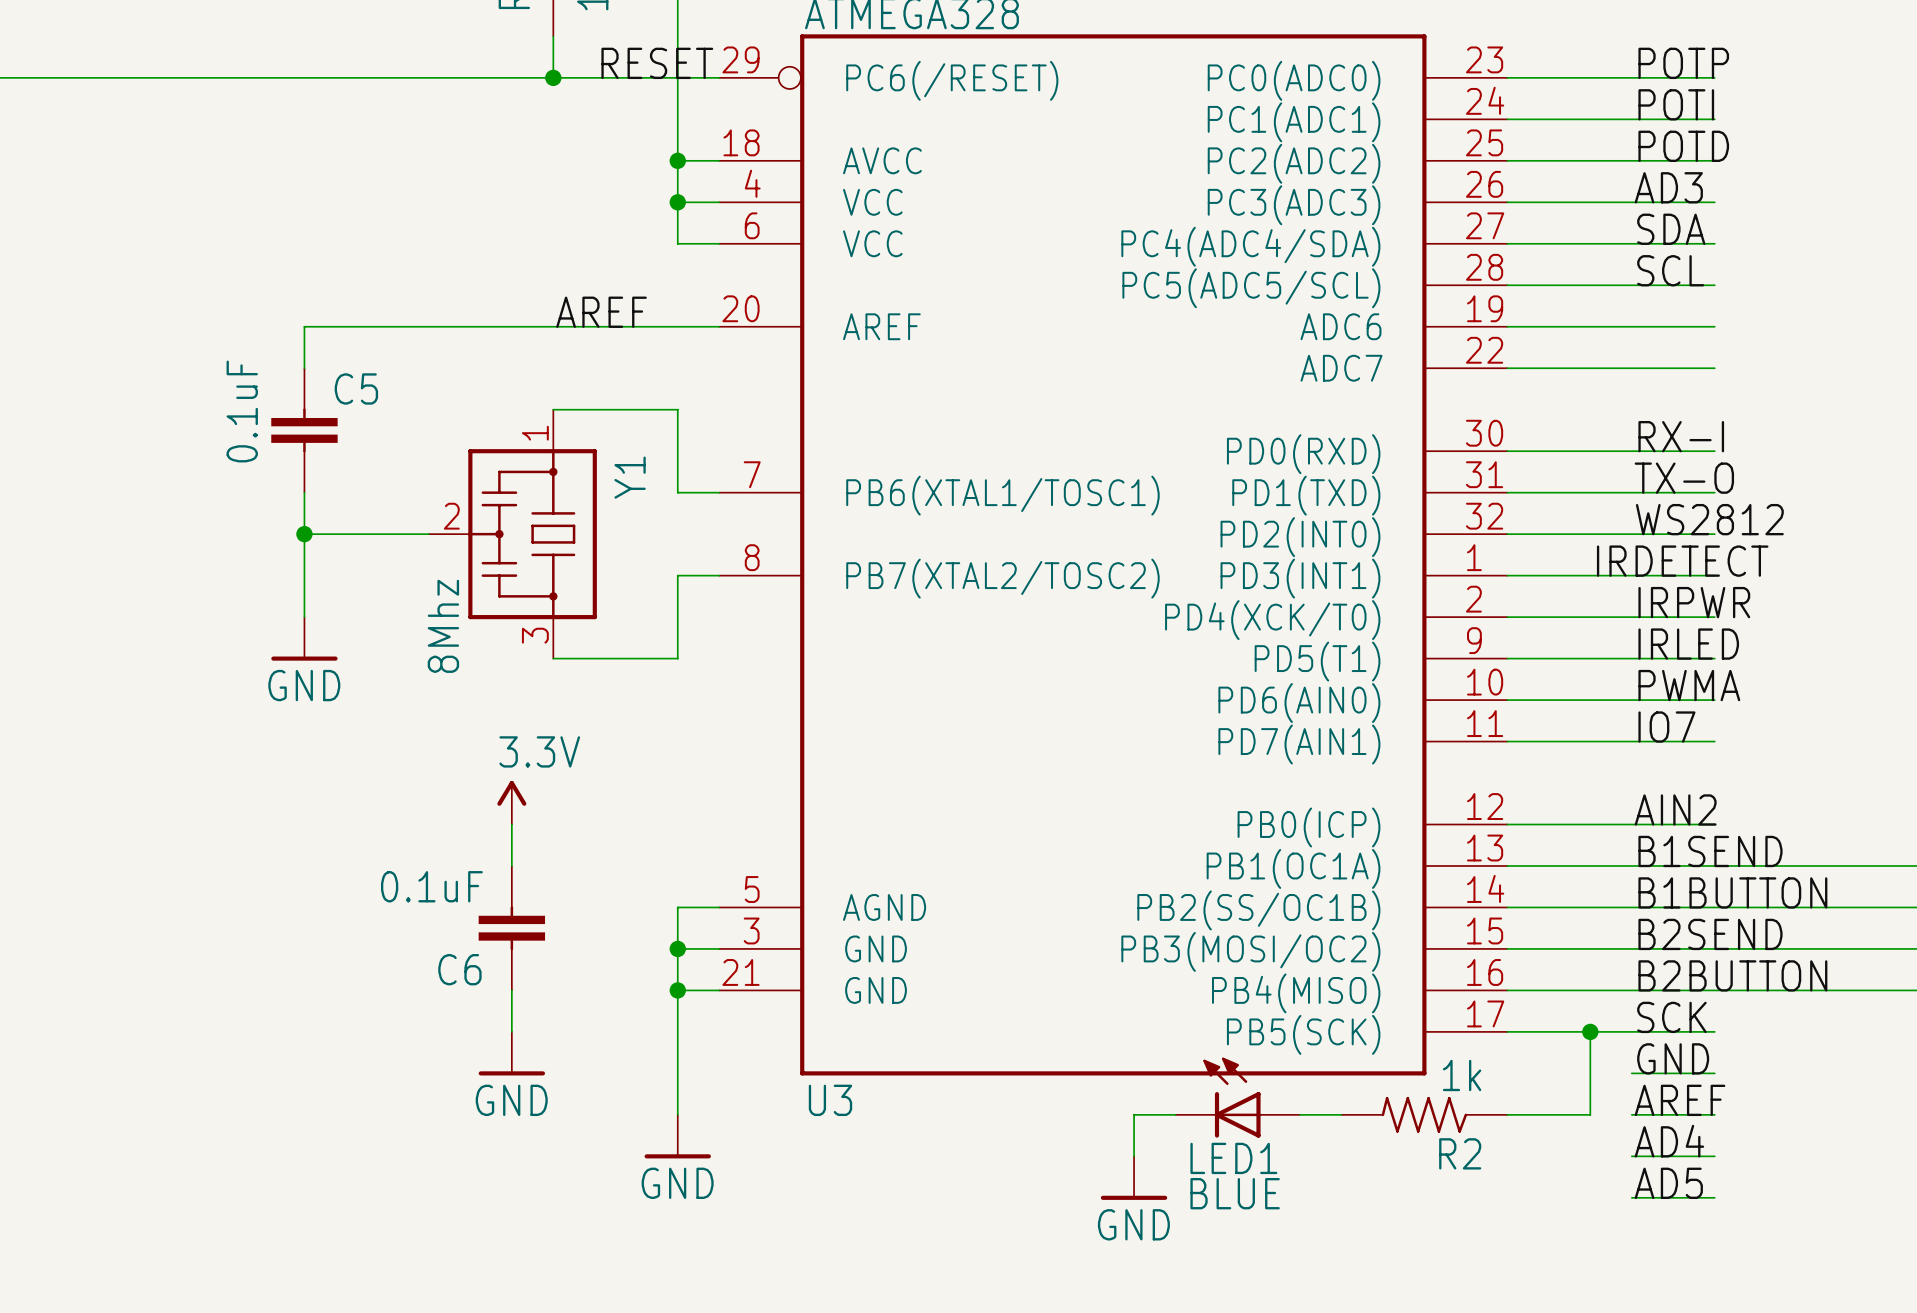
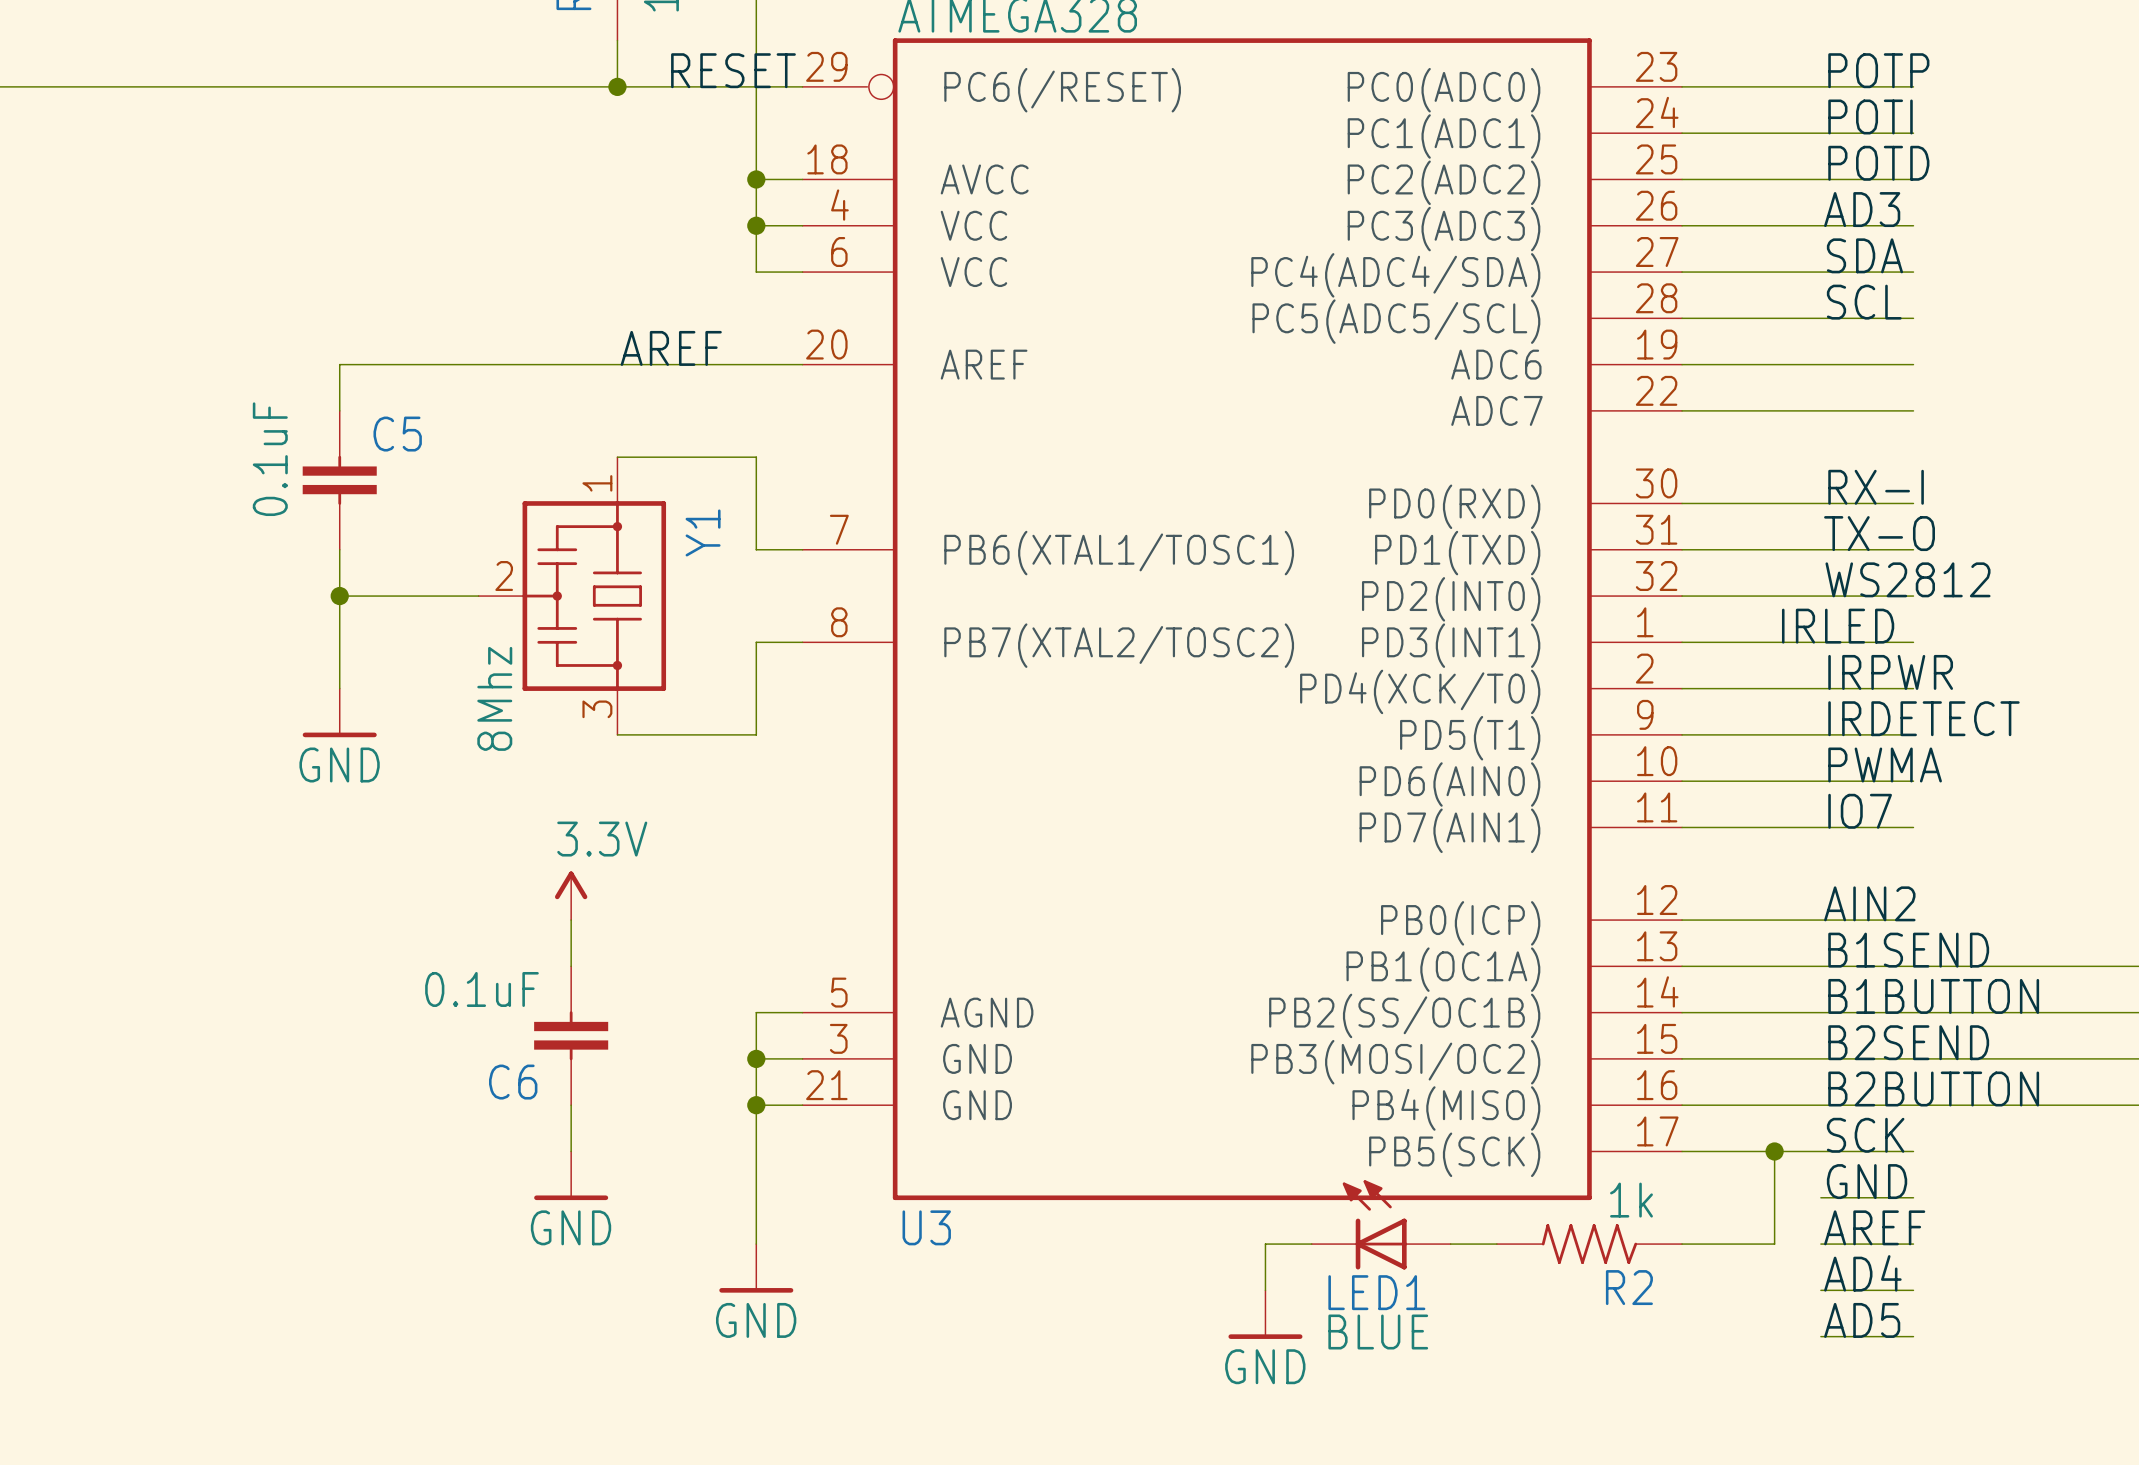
label: IRDETECT (1682, 561) -> IRLED (1838, 626)
label: IRLED (1688, 644) -> IRDETECT (1923, 718)

